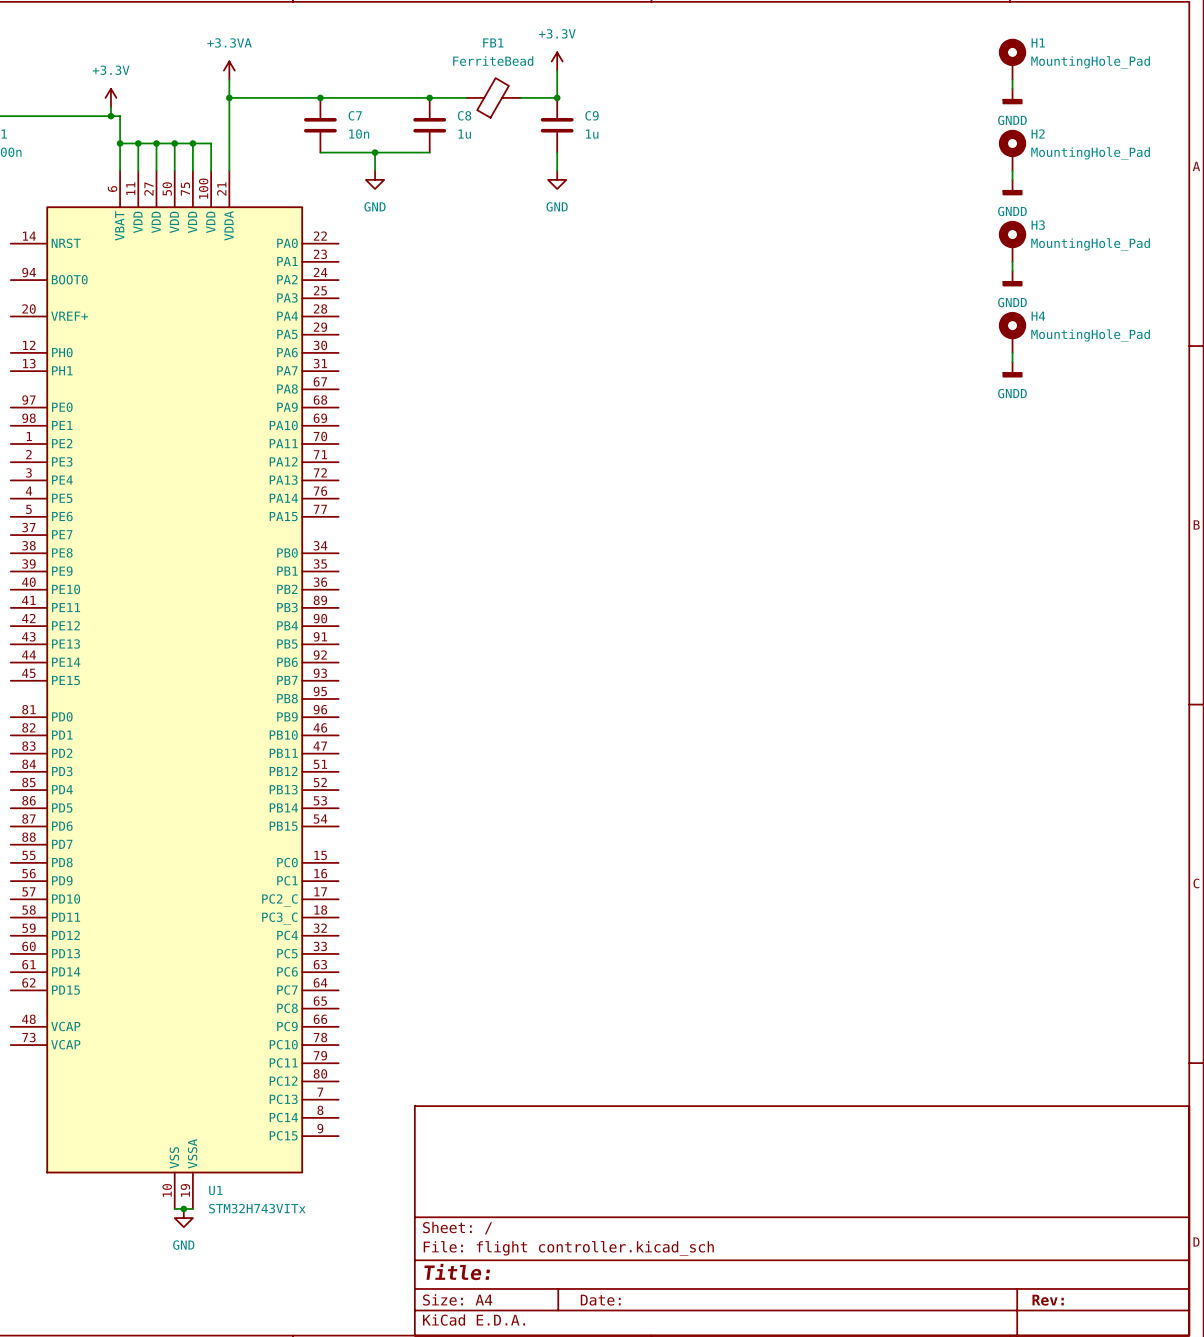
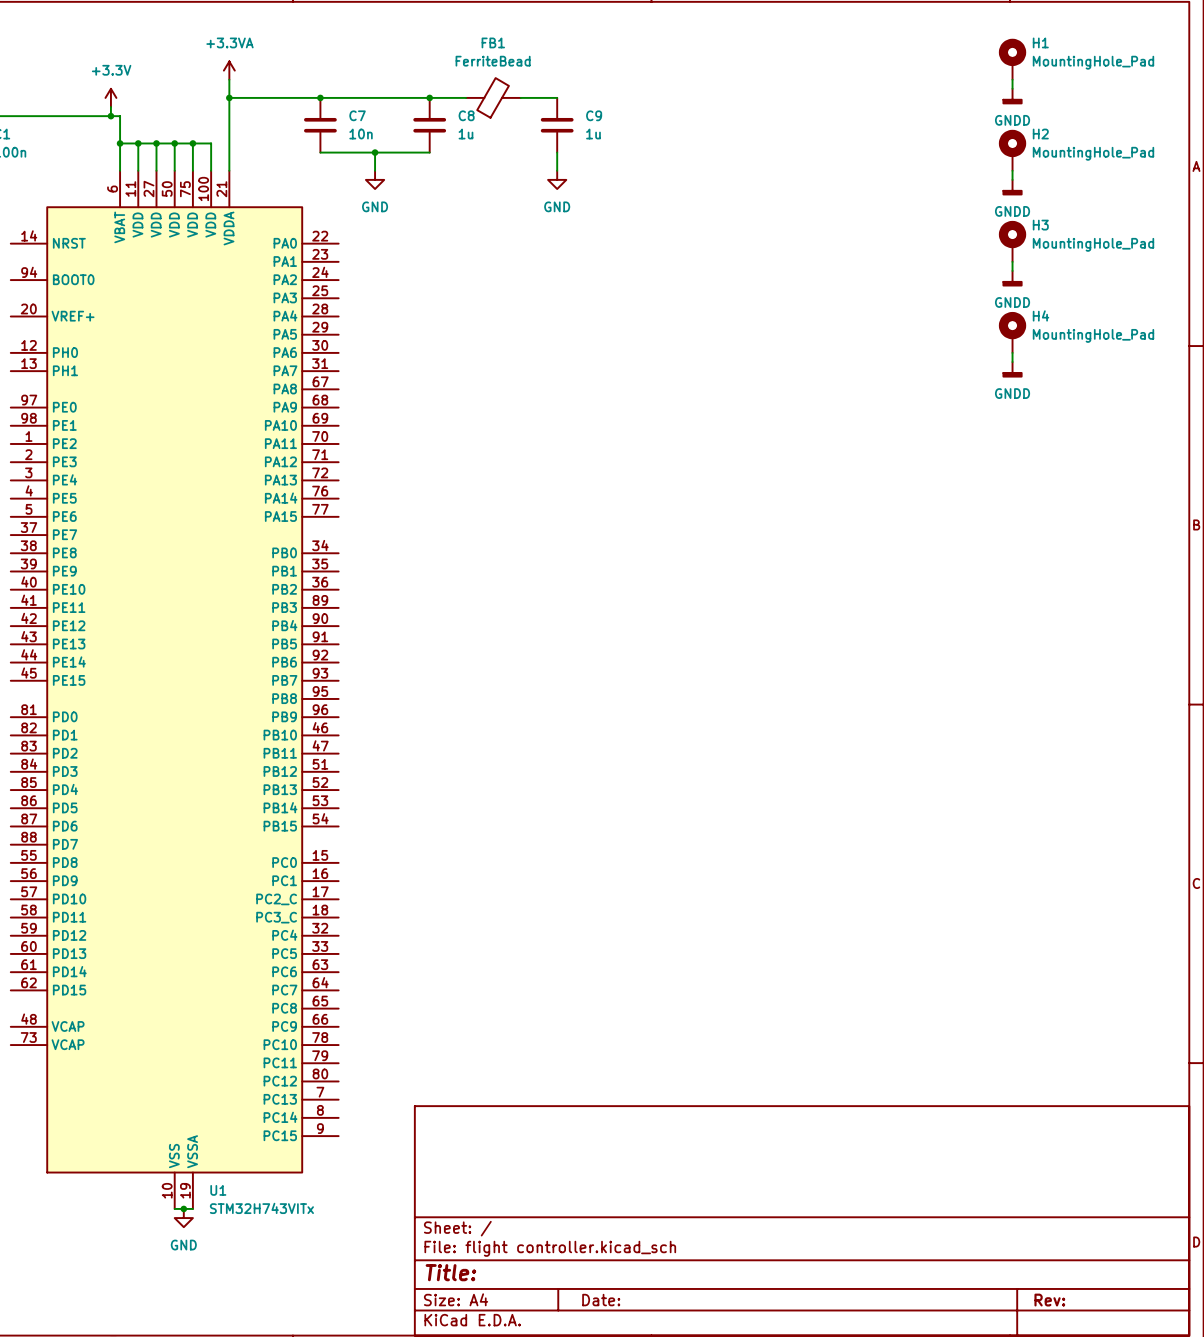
power symbol: +3.3V (557, 61) -> none
wire: (557, 70) (557, 97) -> none
junction: (557, 97) -> none

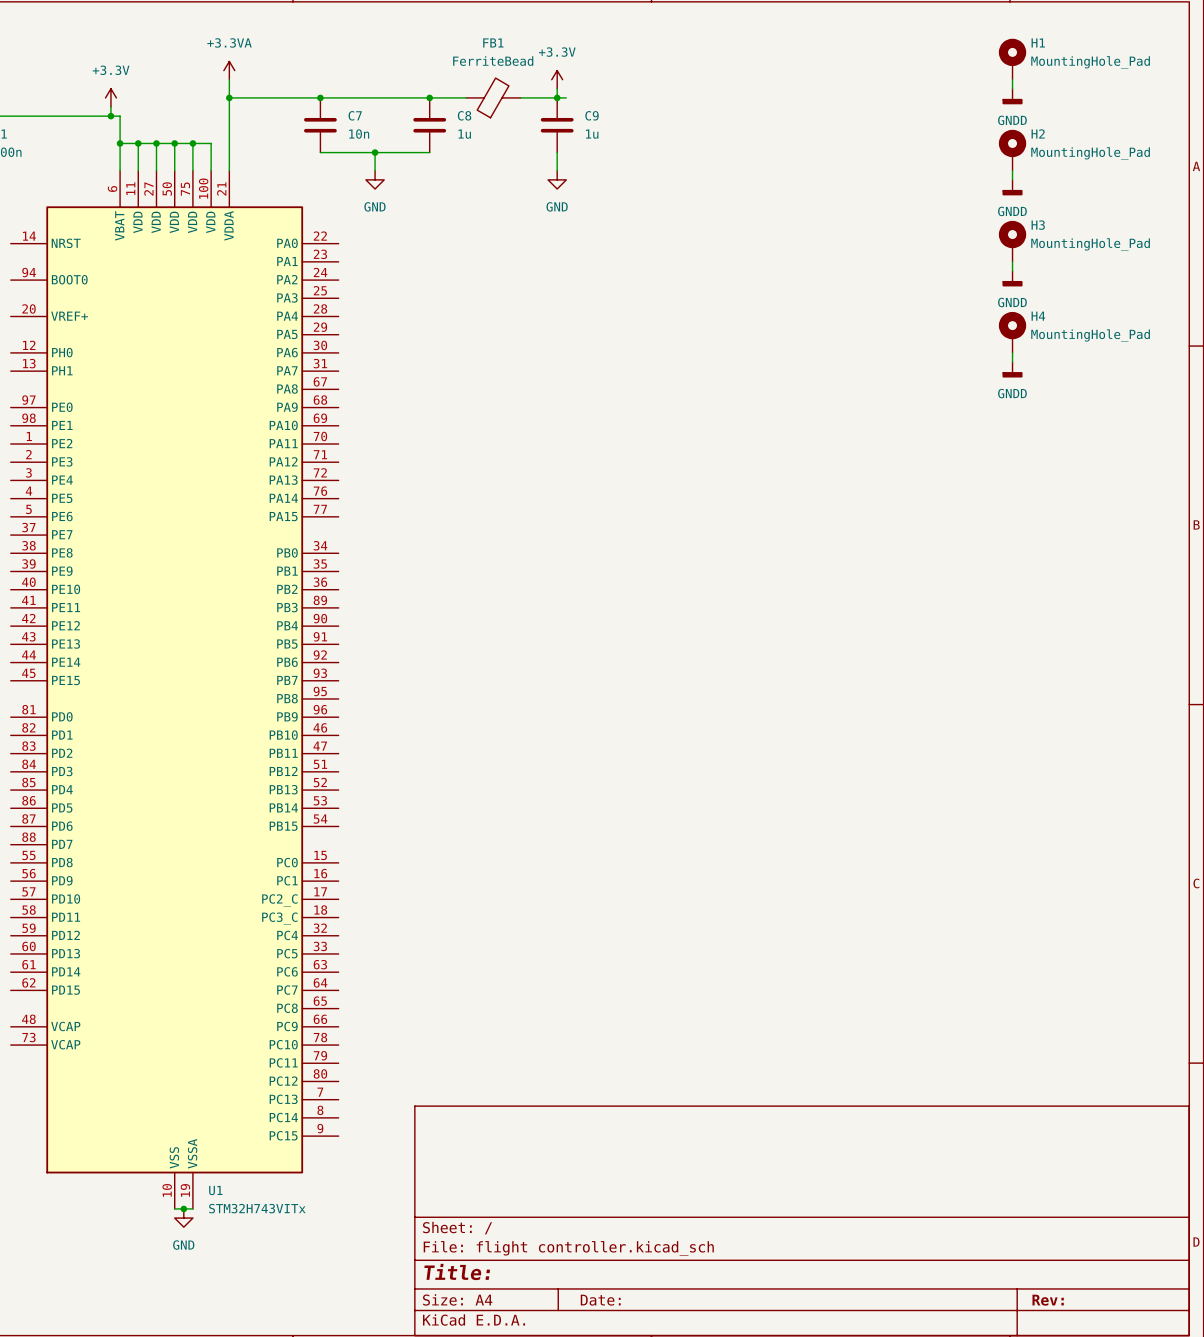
power symbol: none -> +3.3V (557, 79)
wire: none -> (557, 88) (557, 97) (566, 97)
junction: none -> (557, 97)

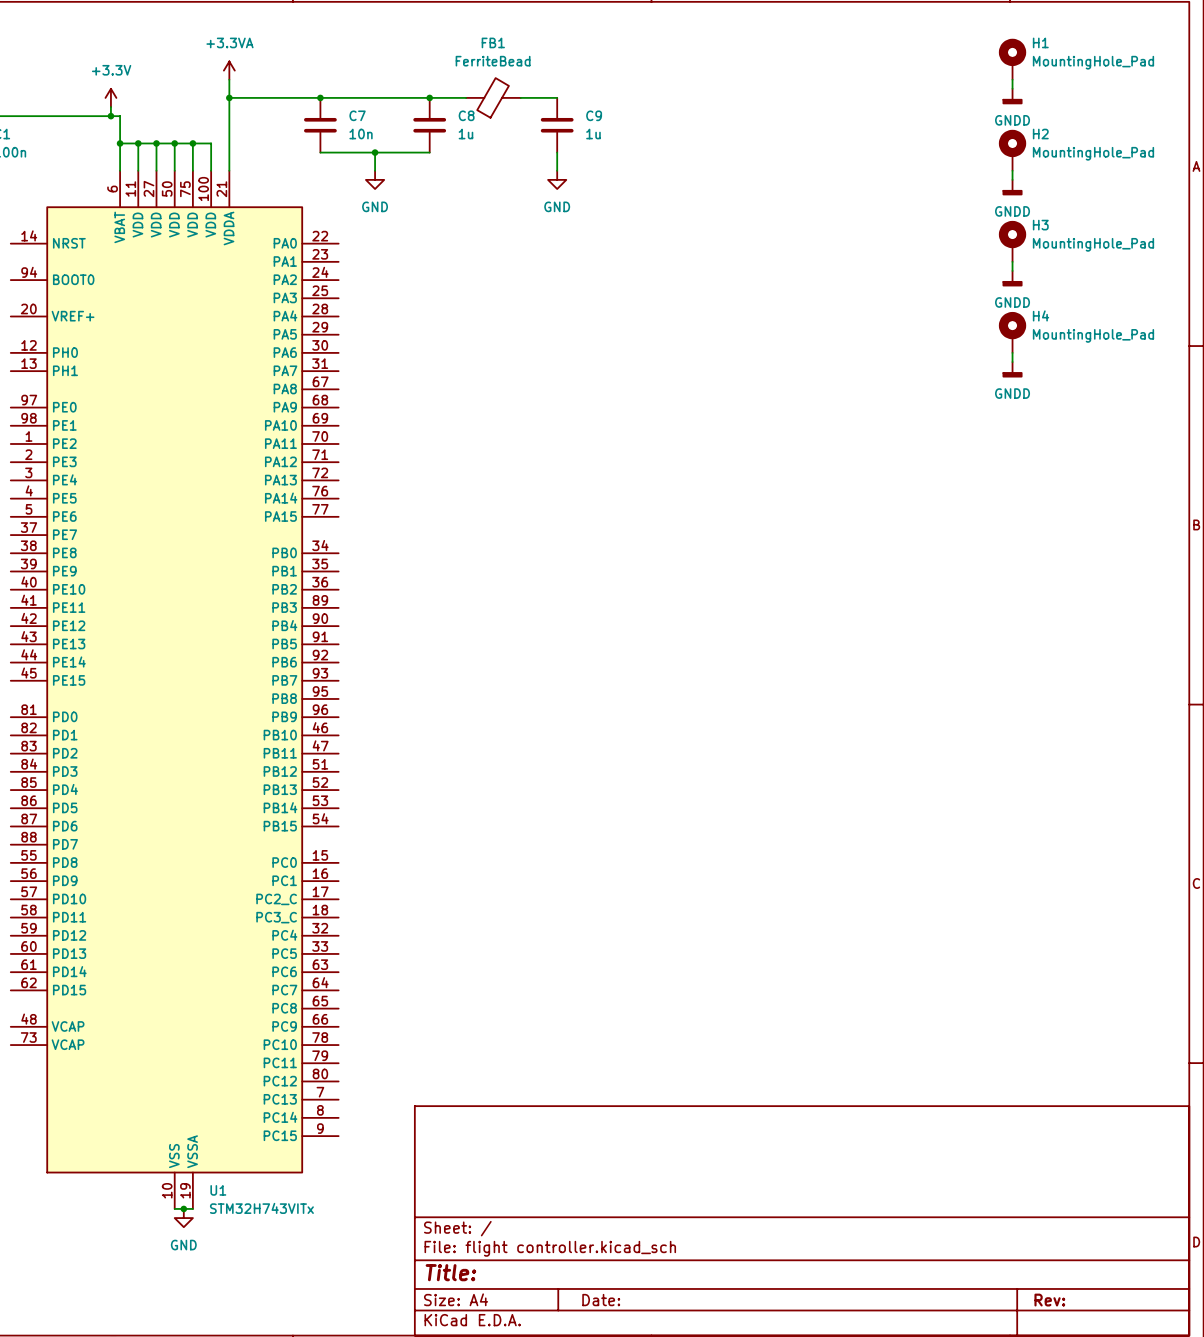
power symbol: +3.3V (557, 79) -> none
wire: (557, 88) (557, 97) (566, 97) -> none
junction: (557, 97) -> none

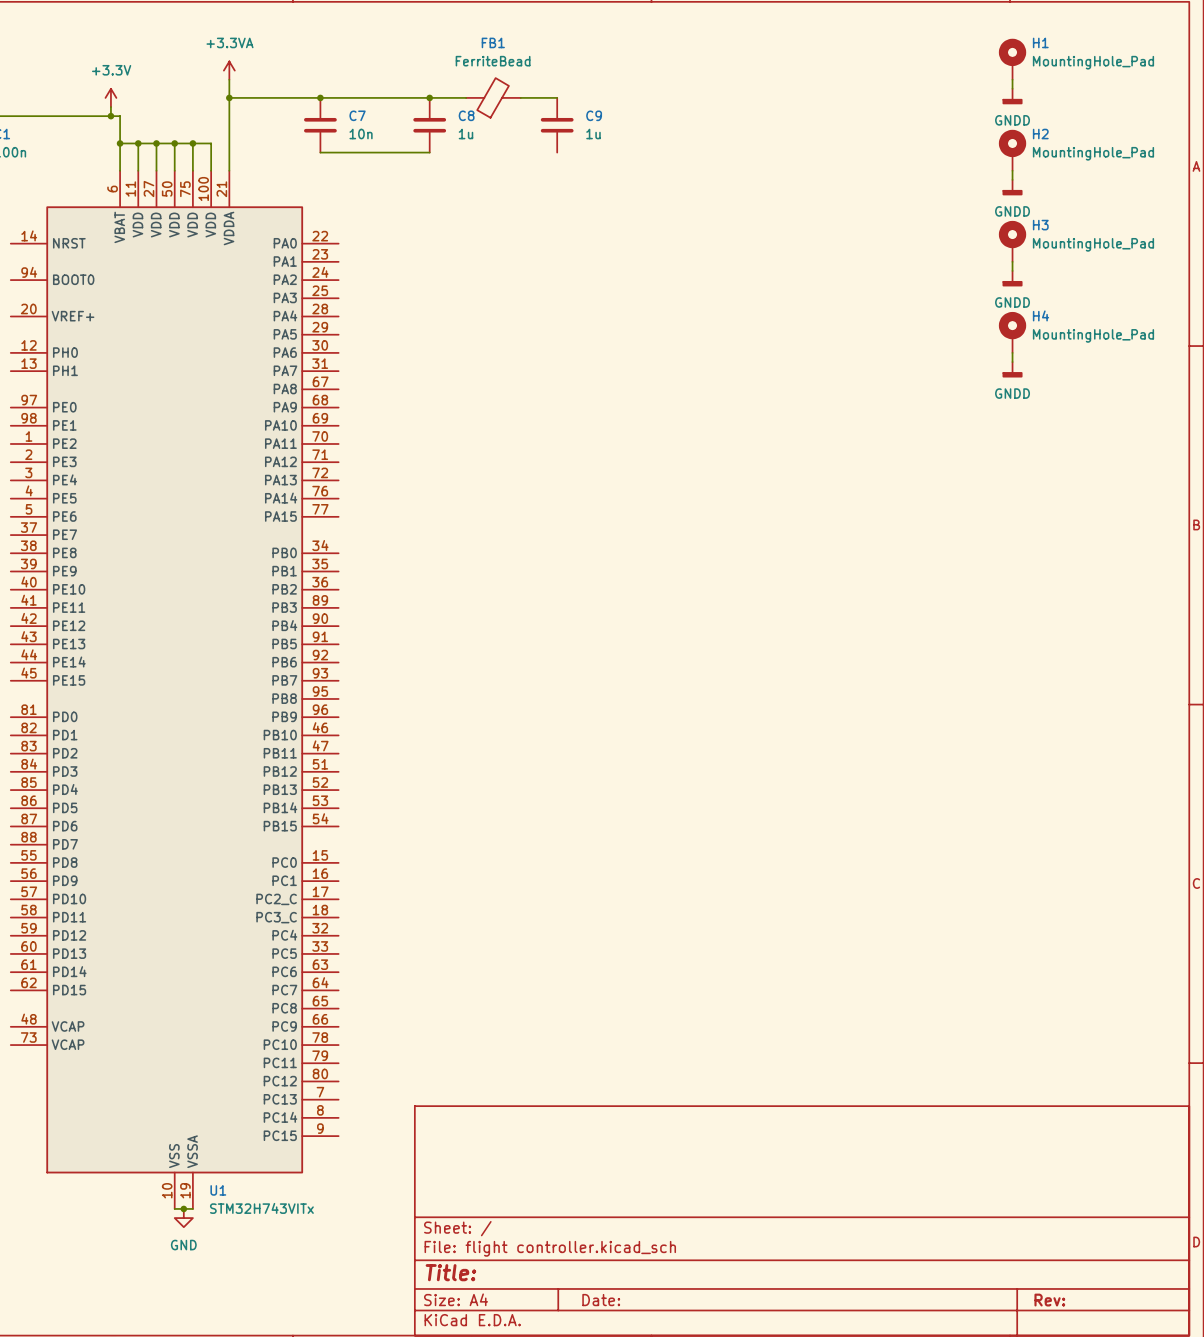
wire: (375, 152) (375, 170) -> none
junction: (375, 152) -> none
wire: (557, 152) (557, 170) -> none
power symbol: GND (375, 179) -> none
power symbol: GND (557, 179) -> none

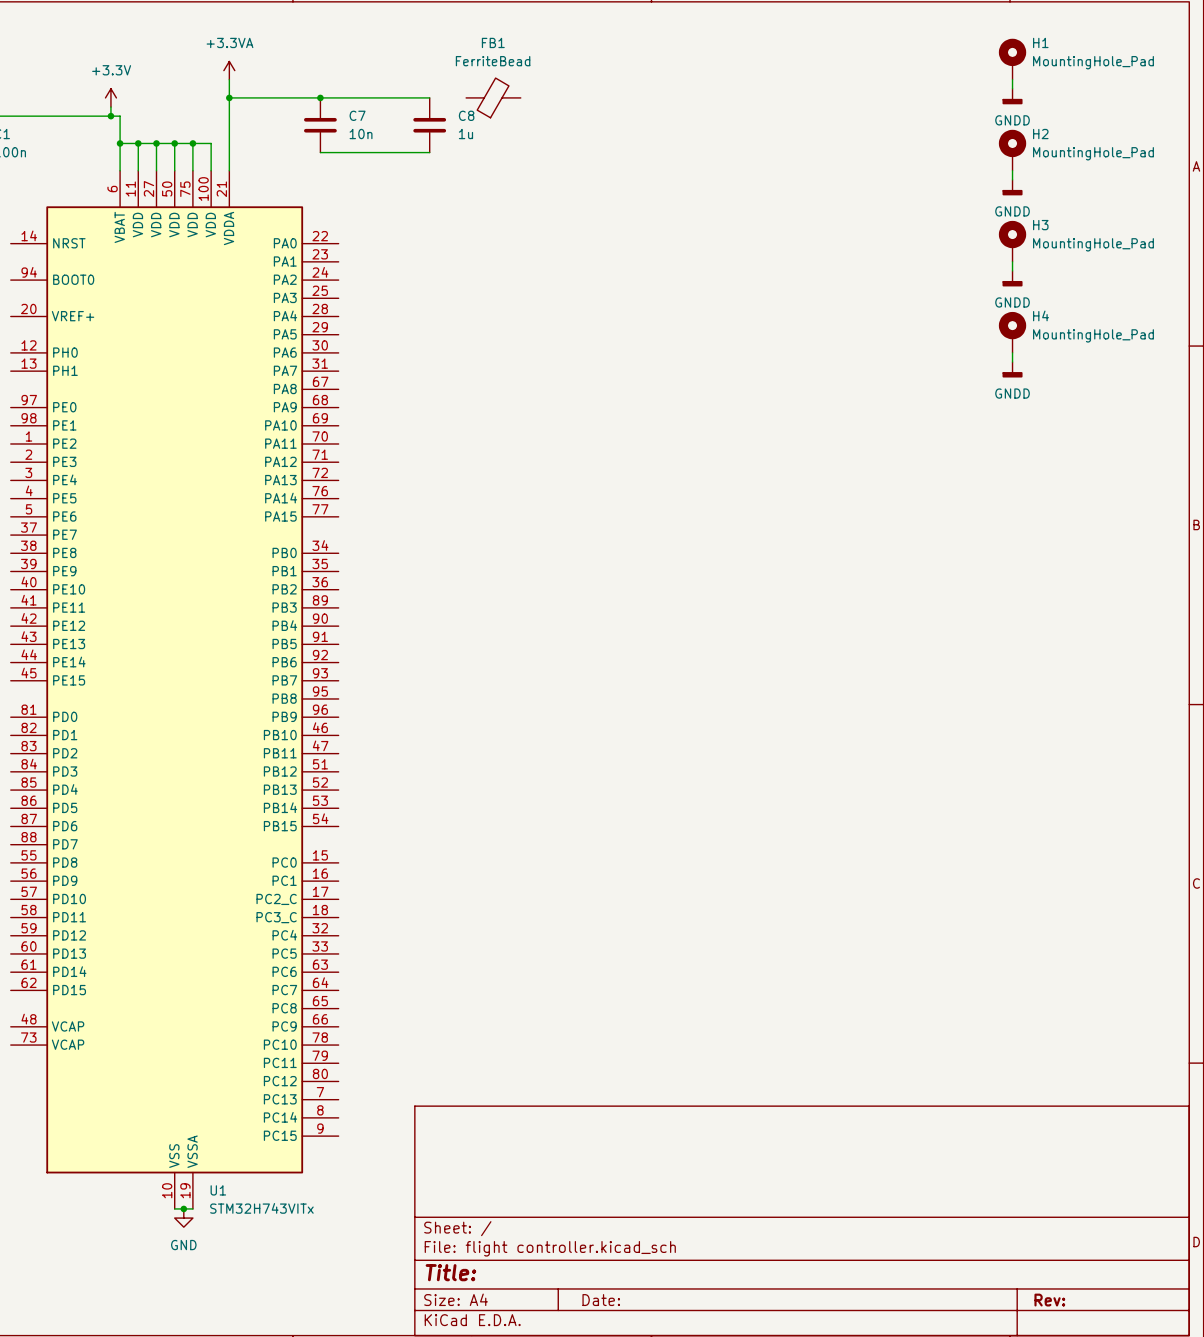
wire: (429, 97) (466, 97) -> none
junction: (429, 97) -> none
wire: (520, 97) (557, 97) -> none
C9: 1u (557, 125) -> none

